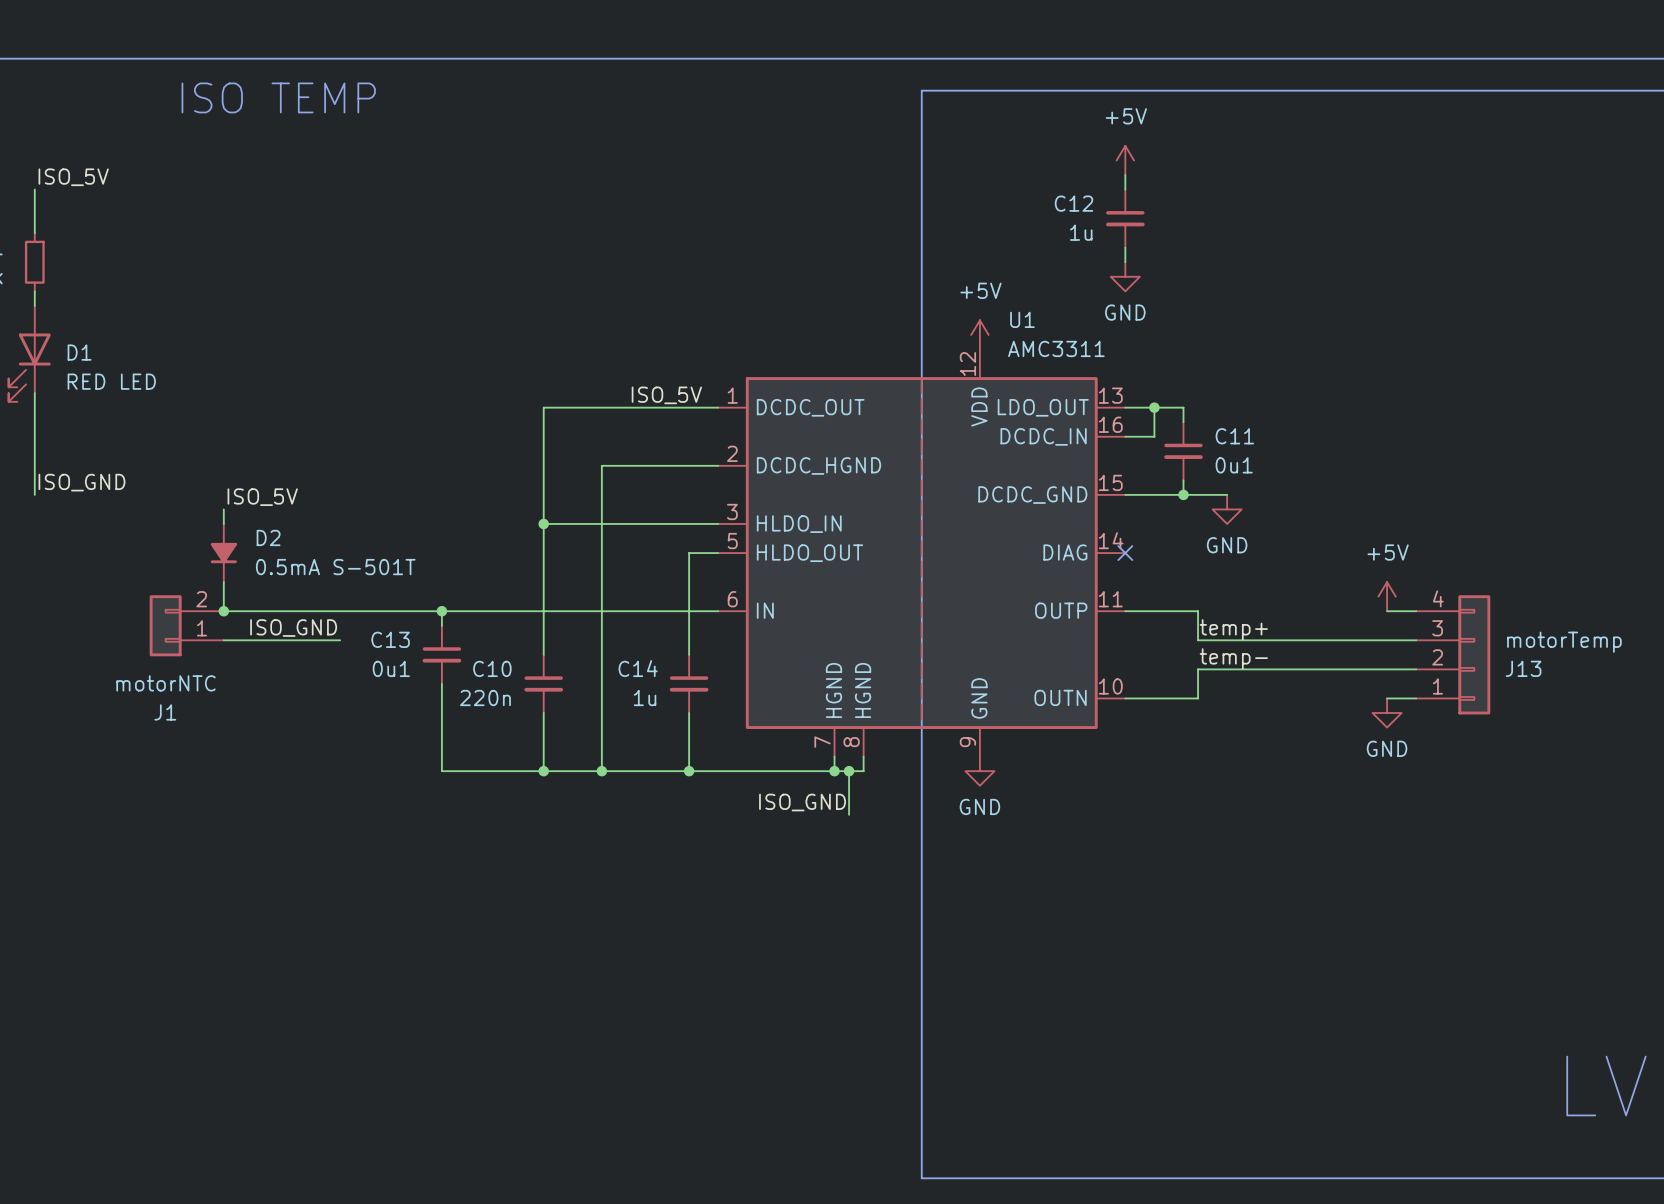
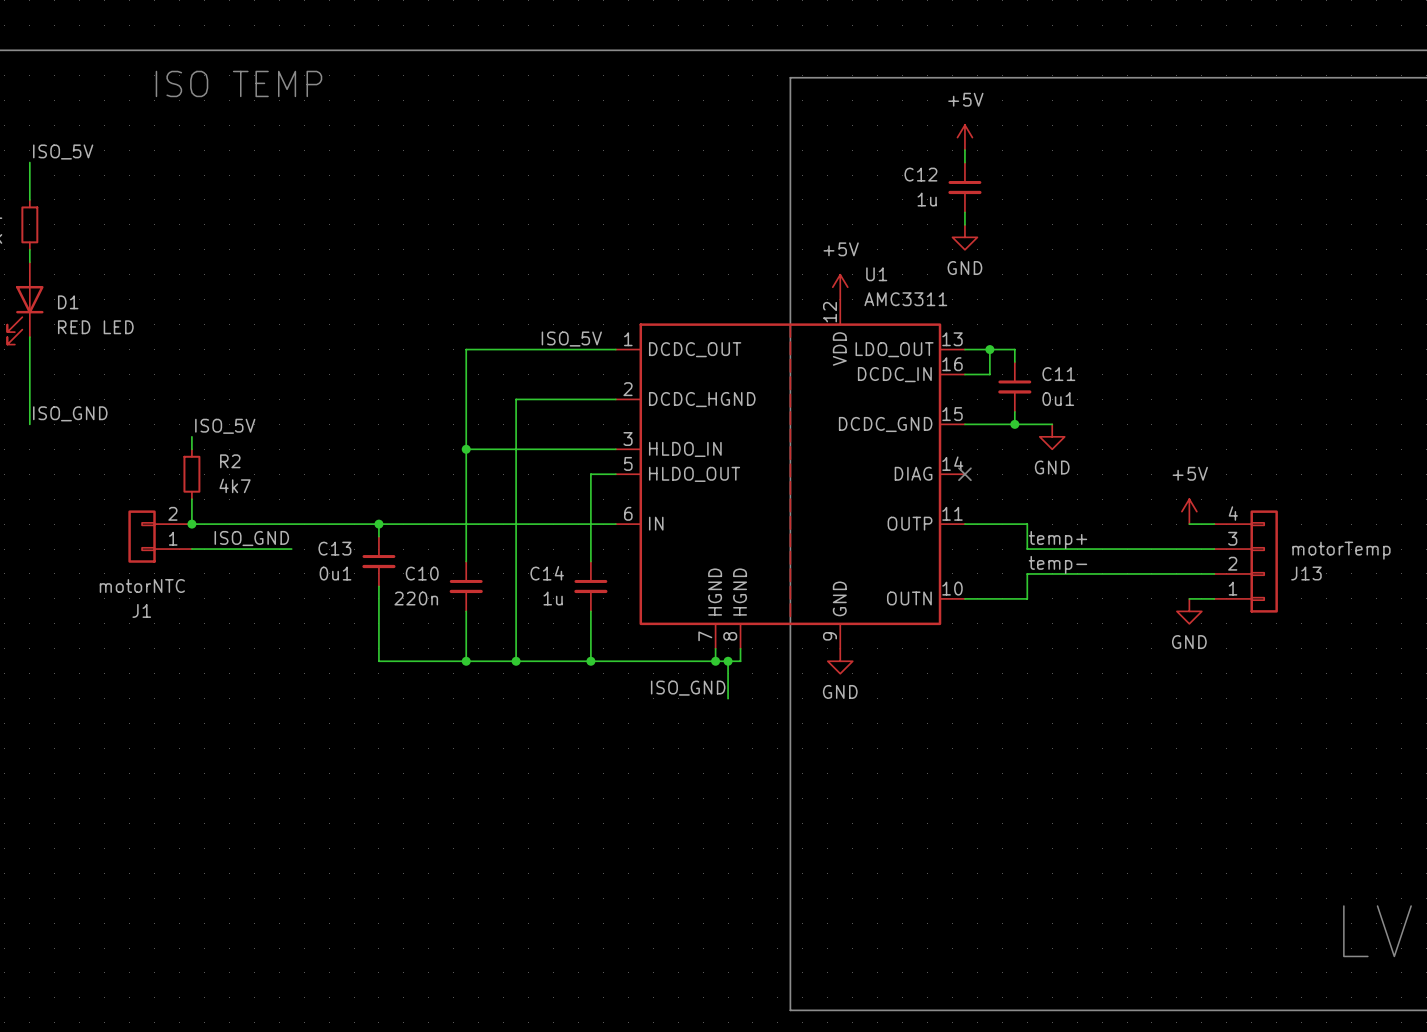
D2: 0.5mA S-501T (223, 553) -> none
R2: none -> 4k7 (191, 474)

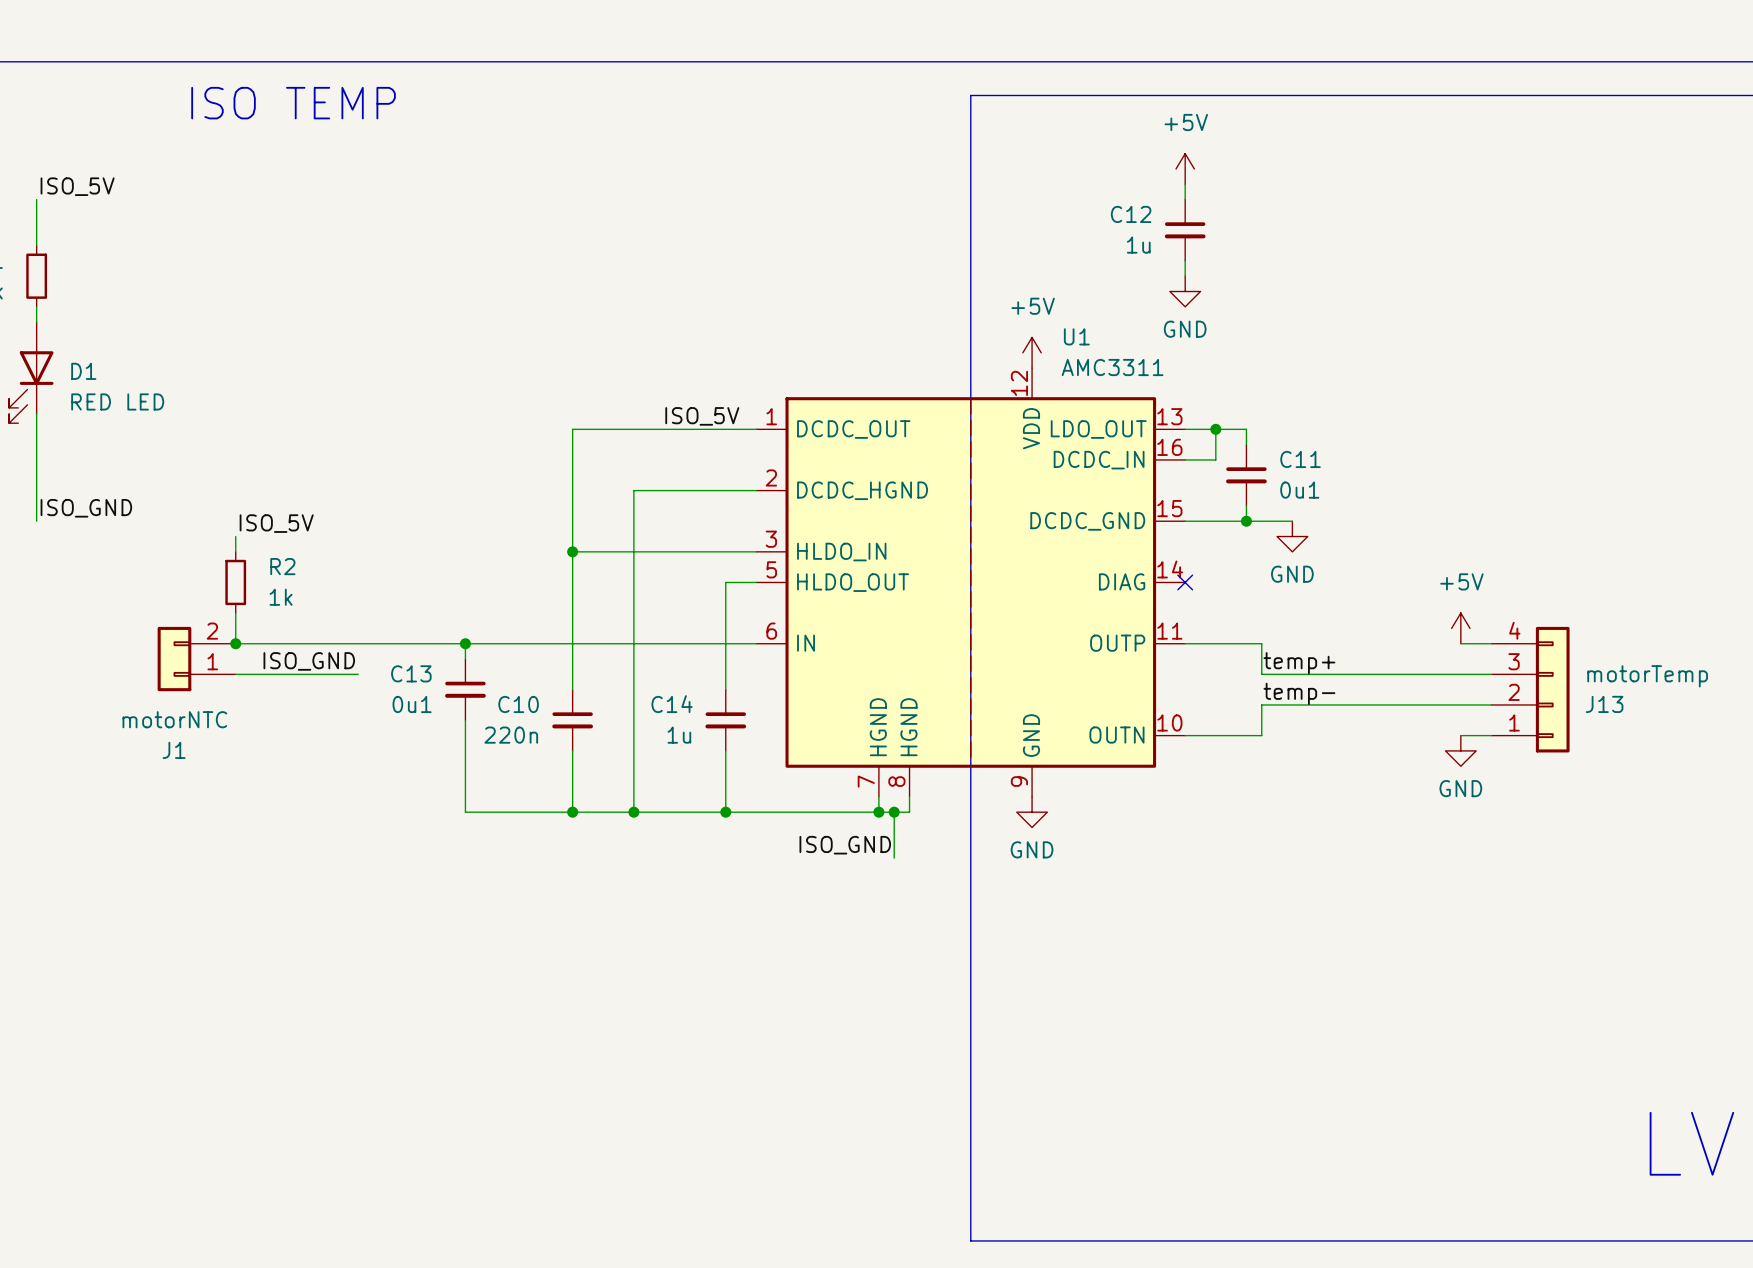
R2 value: 4k7 (235, 485) -> 1k (281, 597)

